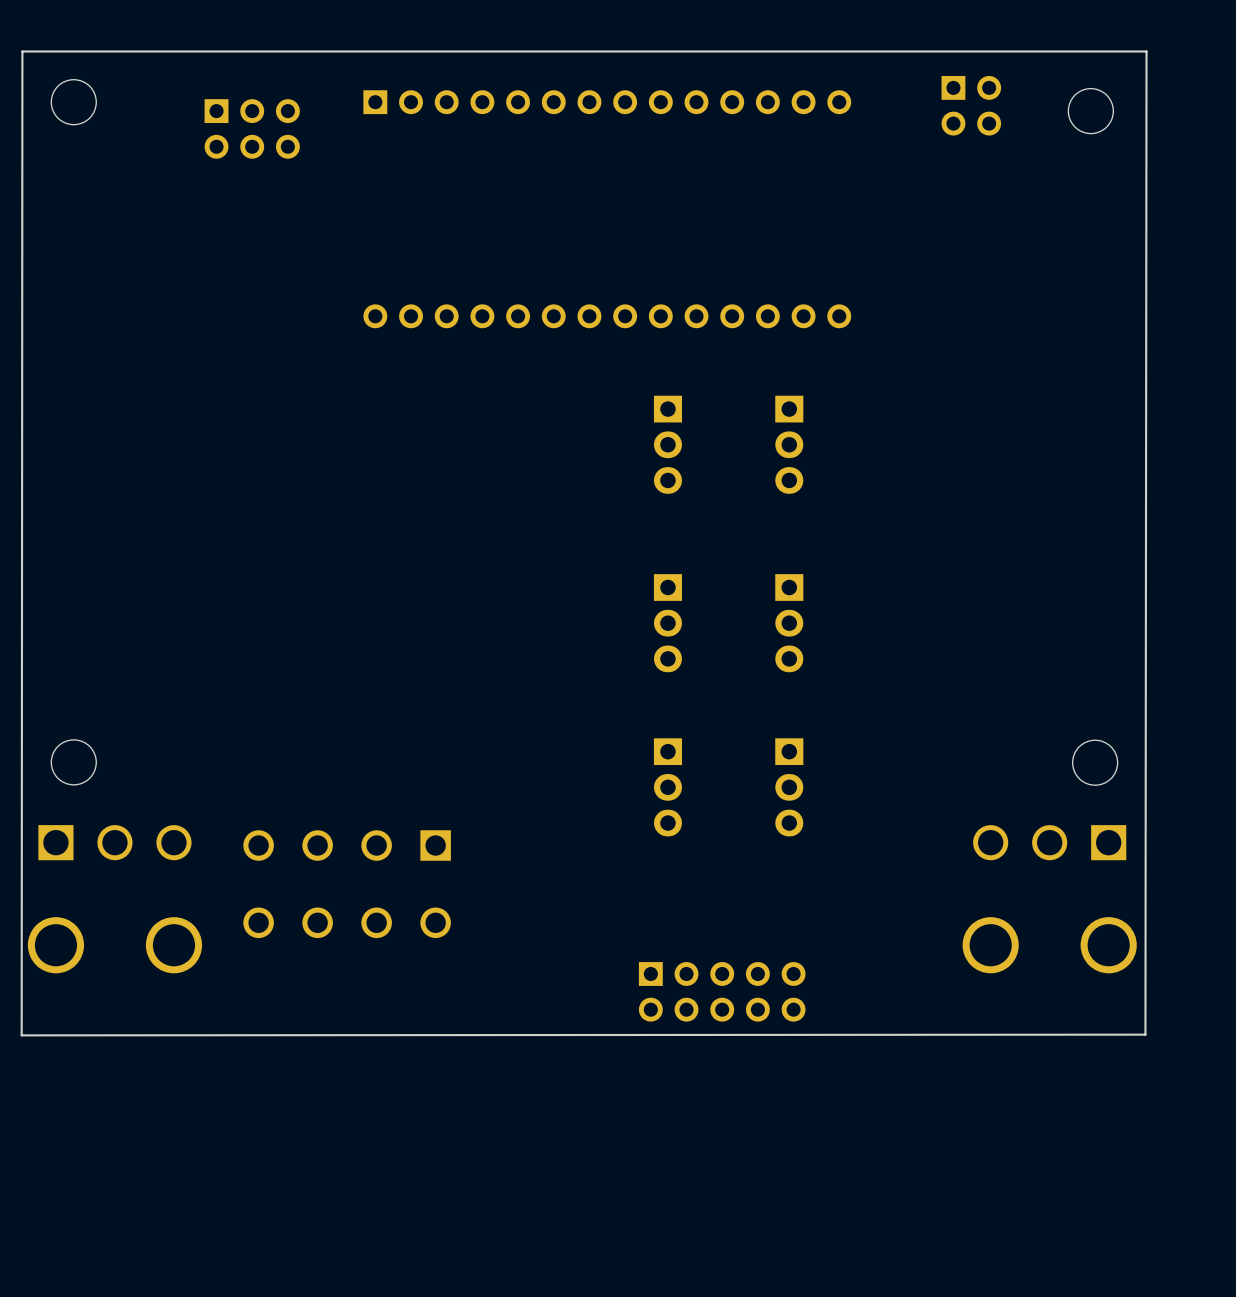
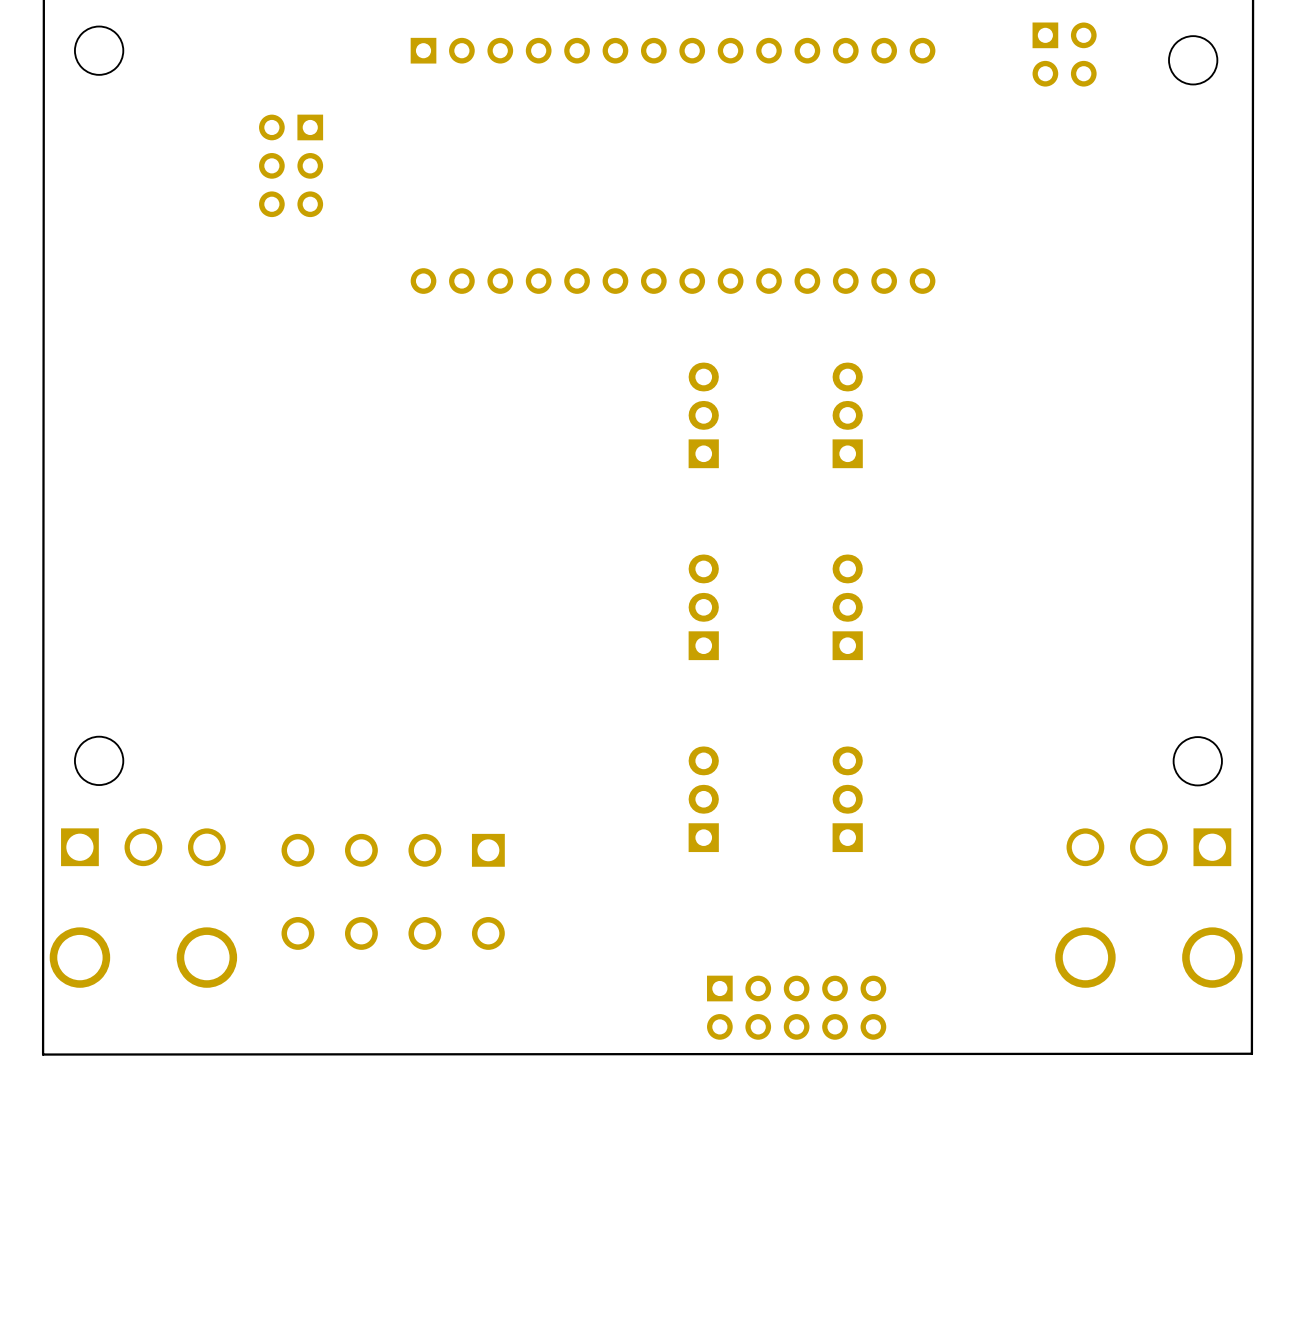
part rotation: 0° (252, 128) -> 90° clockwise (291, 165)
part position: (252, 128) -> (291, 165)
part rotation: 0° (667, 444) -> 180° (703, 415)
part rotation: 0° (789, 444) -> 180° (847, 415)
part rotation: 0° (667, 623) -> 180° (703, 607)
part rotation: 0° (789, 623) -> 180° (847, 607)
part rotation: 0° (667, 787) -> 180° (703, 799)
part rotation: 0° (789, 787) -> 180° (847, 799)

